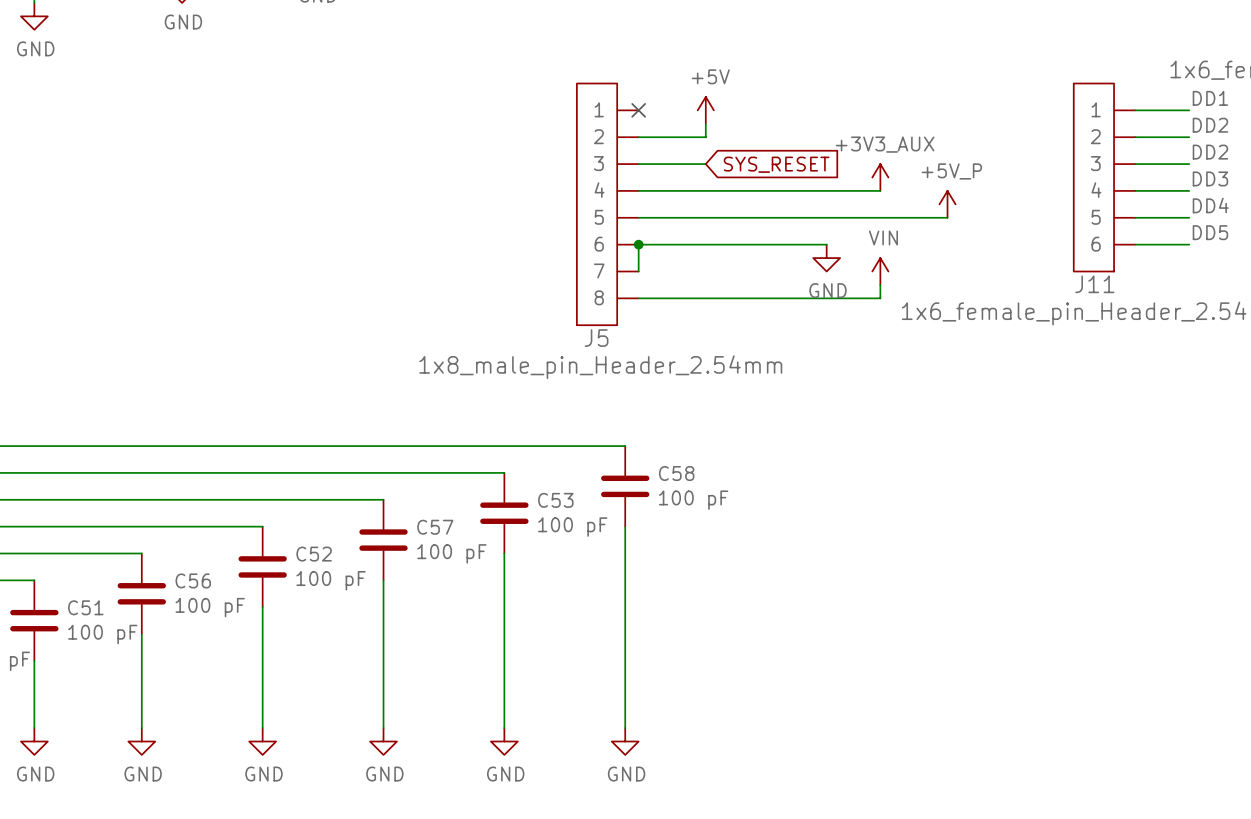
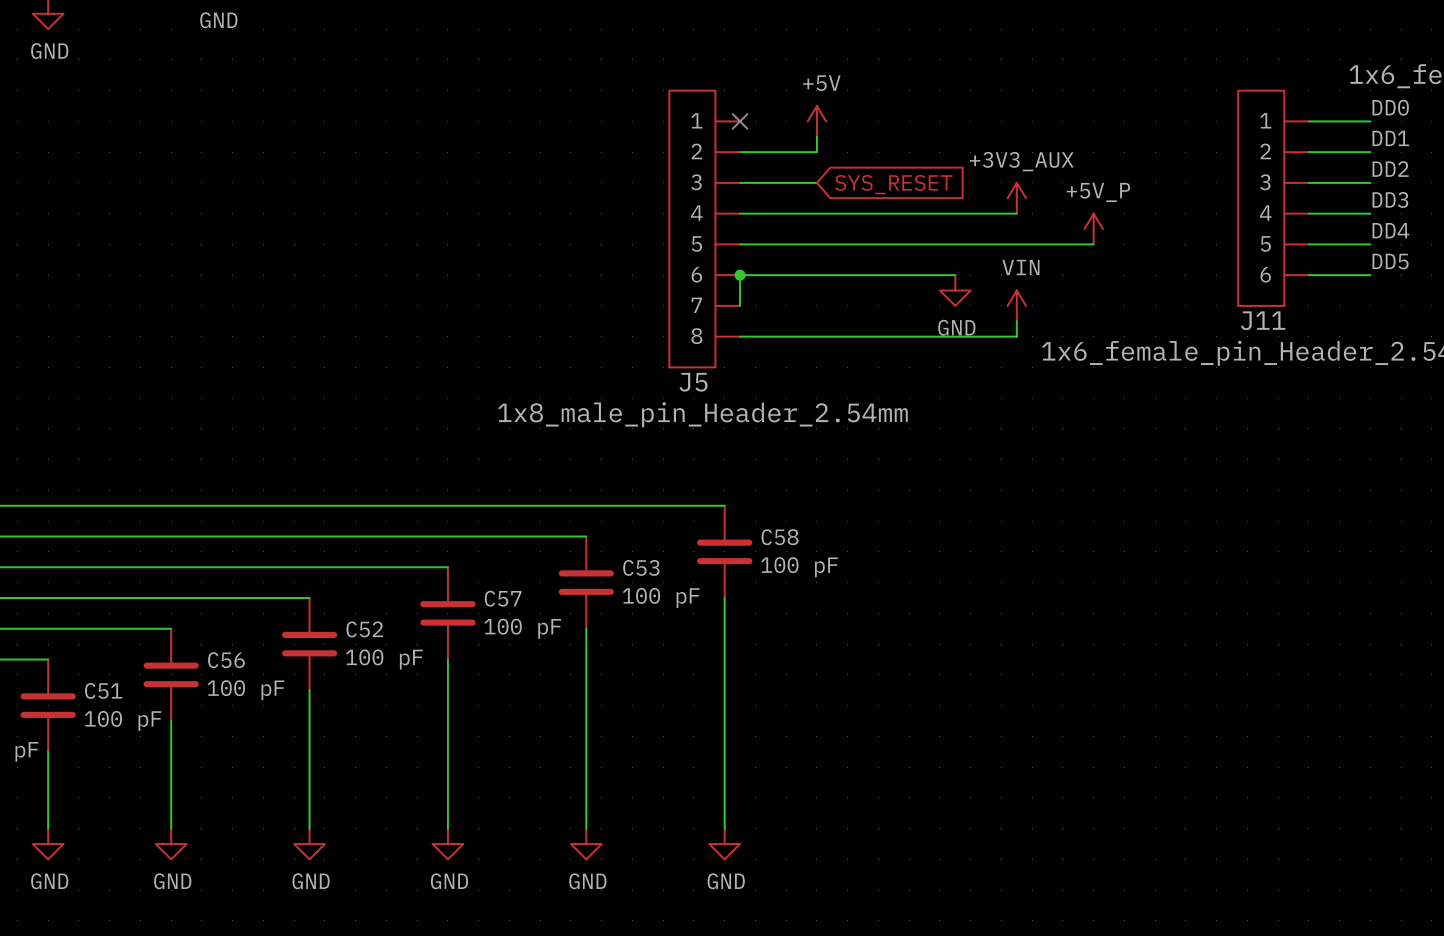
label: DD1 (1210, 98) -> DD0 (1390, 107)
label: DD2 (1210, 125) -> DD1 (1390, 138)

